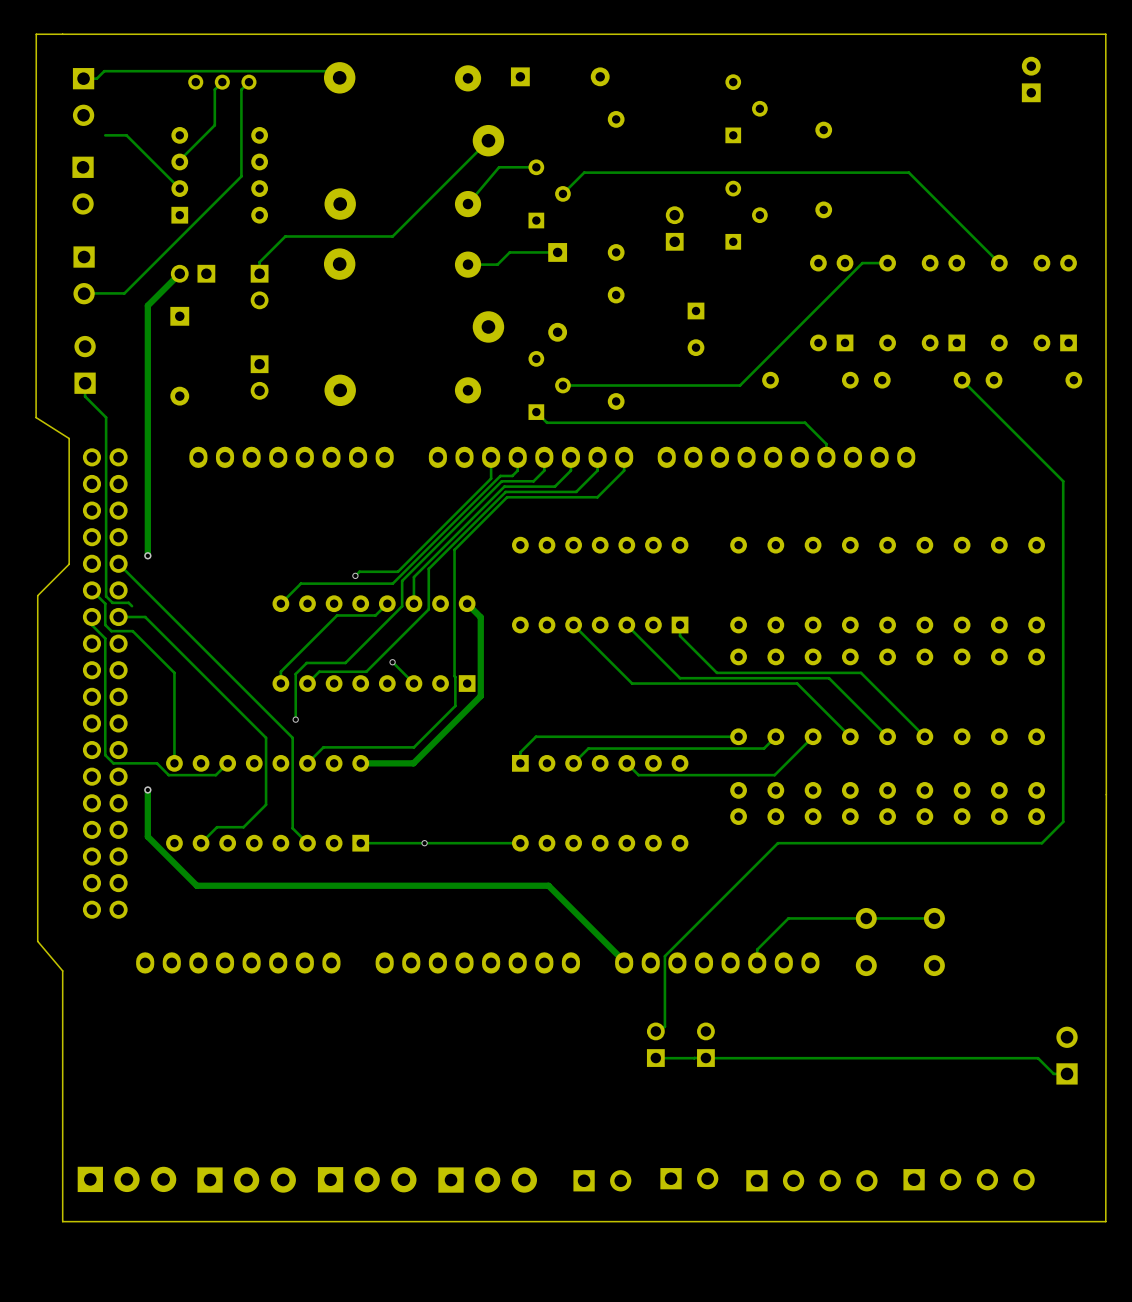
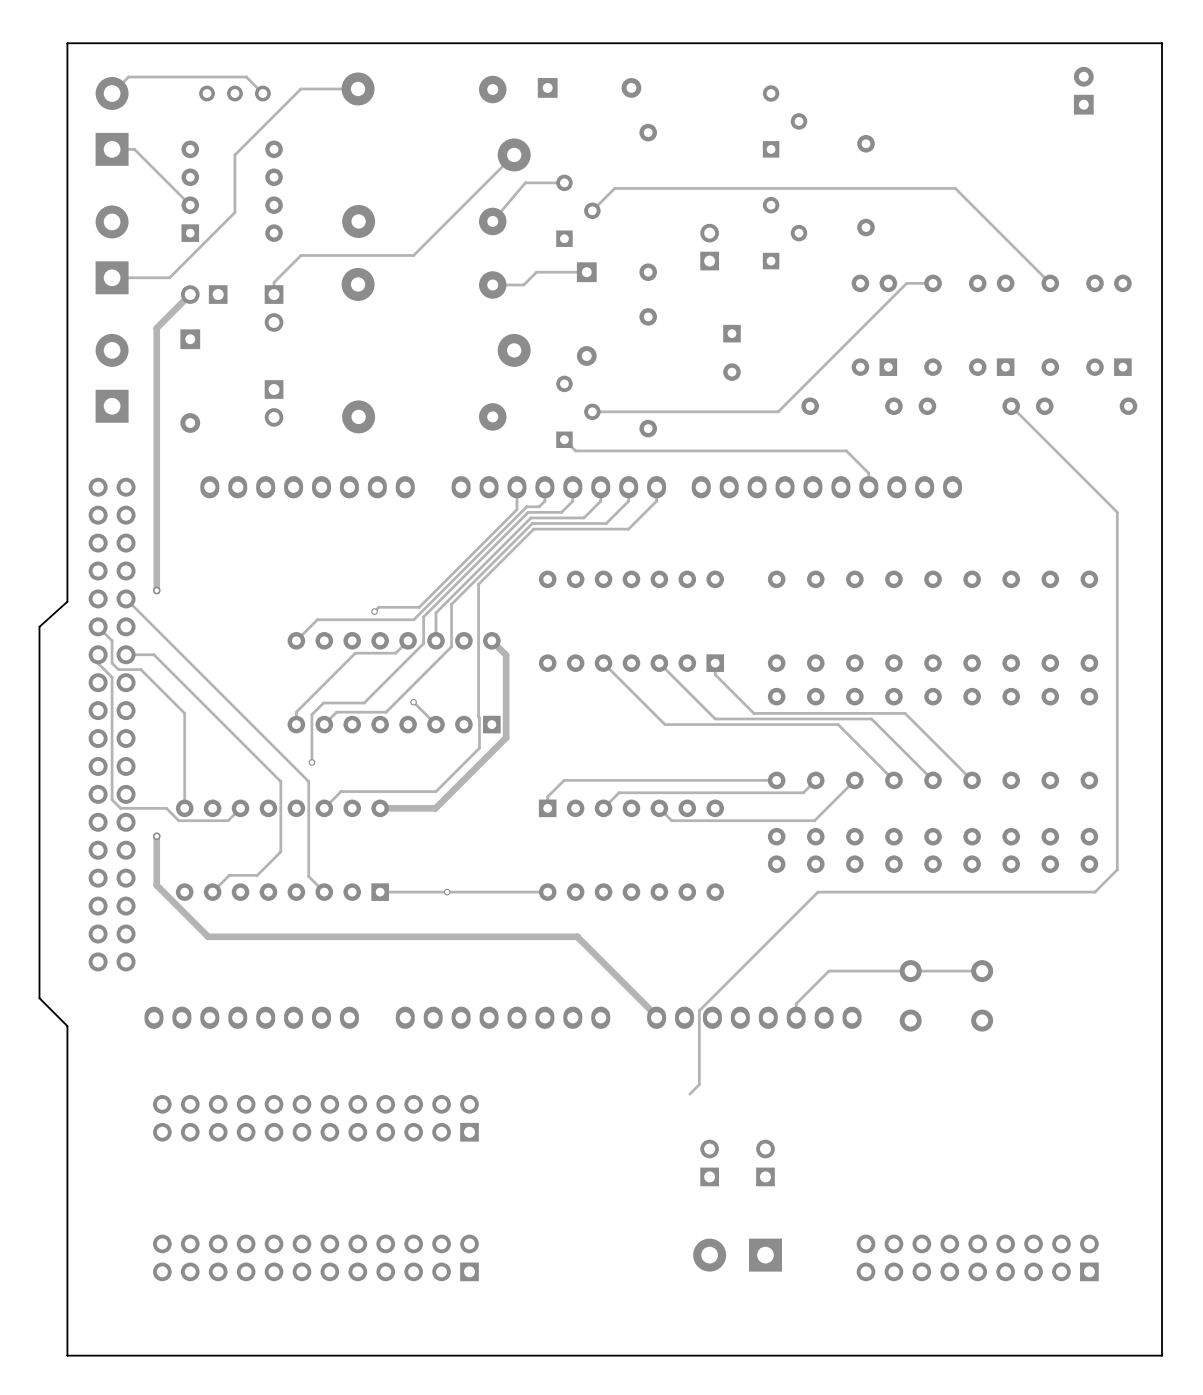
board edge: (62, 34) (36, 34) (36, 417) (69, 438) (69, 564) (37, 595) (37, 941) (62, 970) -> (67, 43) (67, 601) (39, 626) (39, 998) (67, 1026)
board edge: (1105, 34) (1105, 1221) (62, 1221) -> (1162, 43) (1162, 1355) (67, 1355) (67, 1289)
track: (83, 78) (96, 78) (104, 71) (330, 71) (341, 82) -> none
track: (222, 82) (214, 89) (214, 125) (184, 155) -> none
track: (248, 82) (241, 89) (241, 176) (222, 195) -> (358, 88) (300, 88) (234, 154) (234, 212)
track: none -> (262, 93) (246, 77) (128, 77) (112, 93)
part: (83, 96) -> none
part: none -> (112, 121)
part: (83, 185) -> none
part: none -> (112, 249)
track: (160, 257) (124, 293) (82, 293) -> (169, 277) (112, 277)
part: (84, 275) -> none
part: none -> (112, 378)
part: (85, 364) -> none
track: (85, 383) (85, 396) (106, 417) (106, 596) (112, 602) (128, 602) (132, 606) -> none
part: (655, 1044) -> none
part: (705, 1044) -> none
part: (1067, 1055) -> none
part: none -> (315, 1118)
track: (705, 1058) (654, 1058) -> none
track: (706, 1058) (1038, 1058) (1053, 1073) (1067, 1073) -> none
part: none -> (709, 1162)
part: none -> (765, 1162)
part: (689, 1178) -> none
part: (126, 1179) -> none
part: (367, 1179) -> none
part: (969, 1179) -> none
part: (246, 1180) -> none
part: (487, 1180) -> none
part: (602, 1180) -> none
part: (811, 1180) -> none
part: none -> (737, 1255)
part: none -> (315, 1257)
part: none -> (977, 1257)

